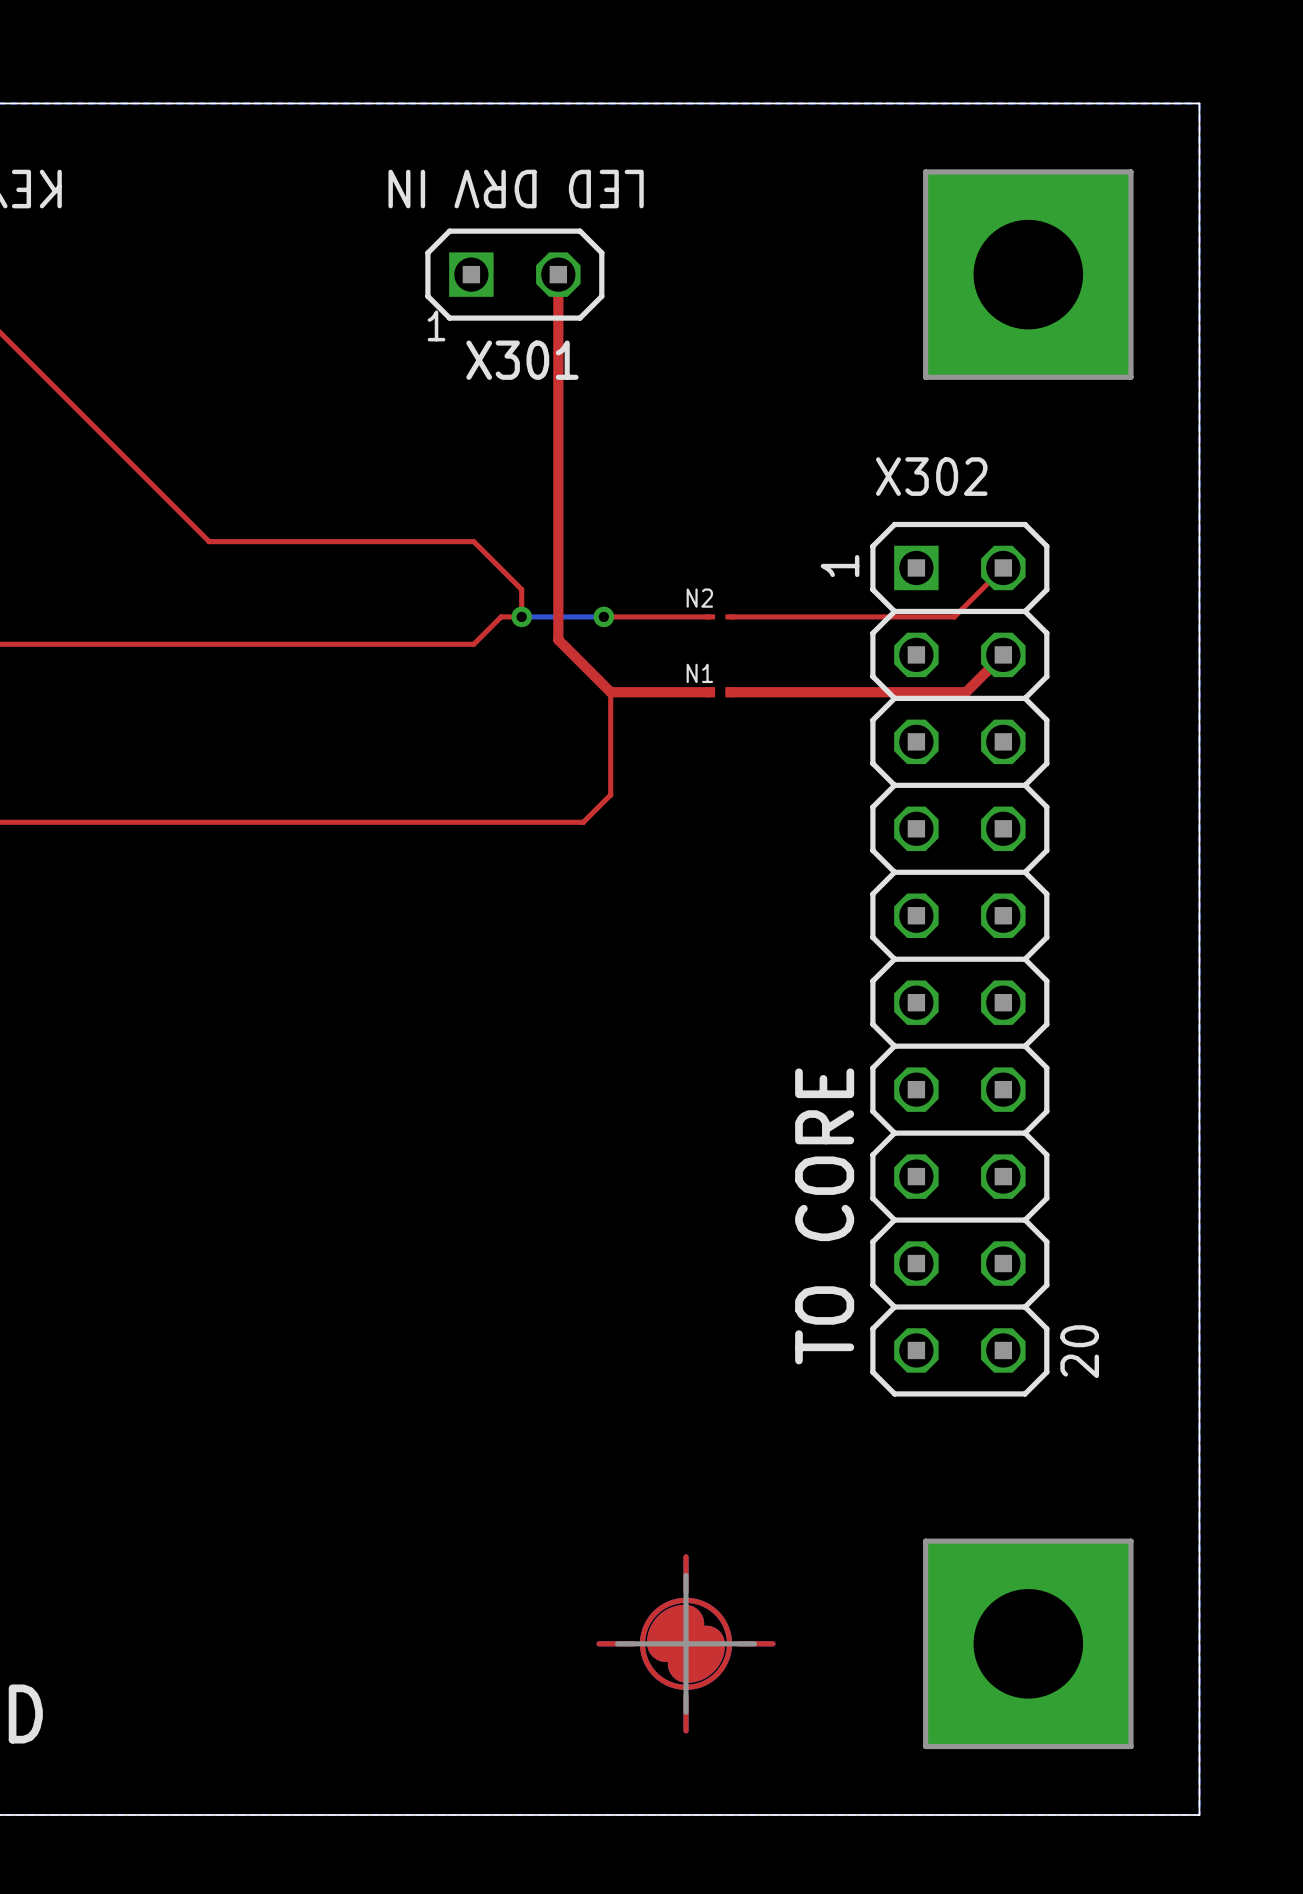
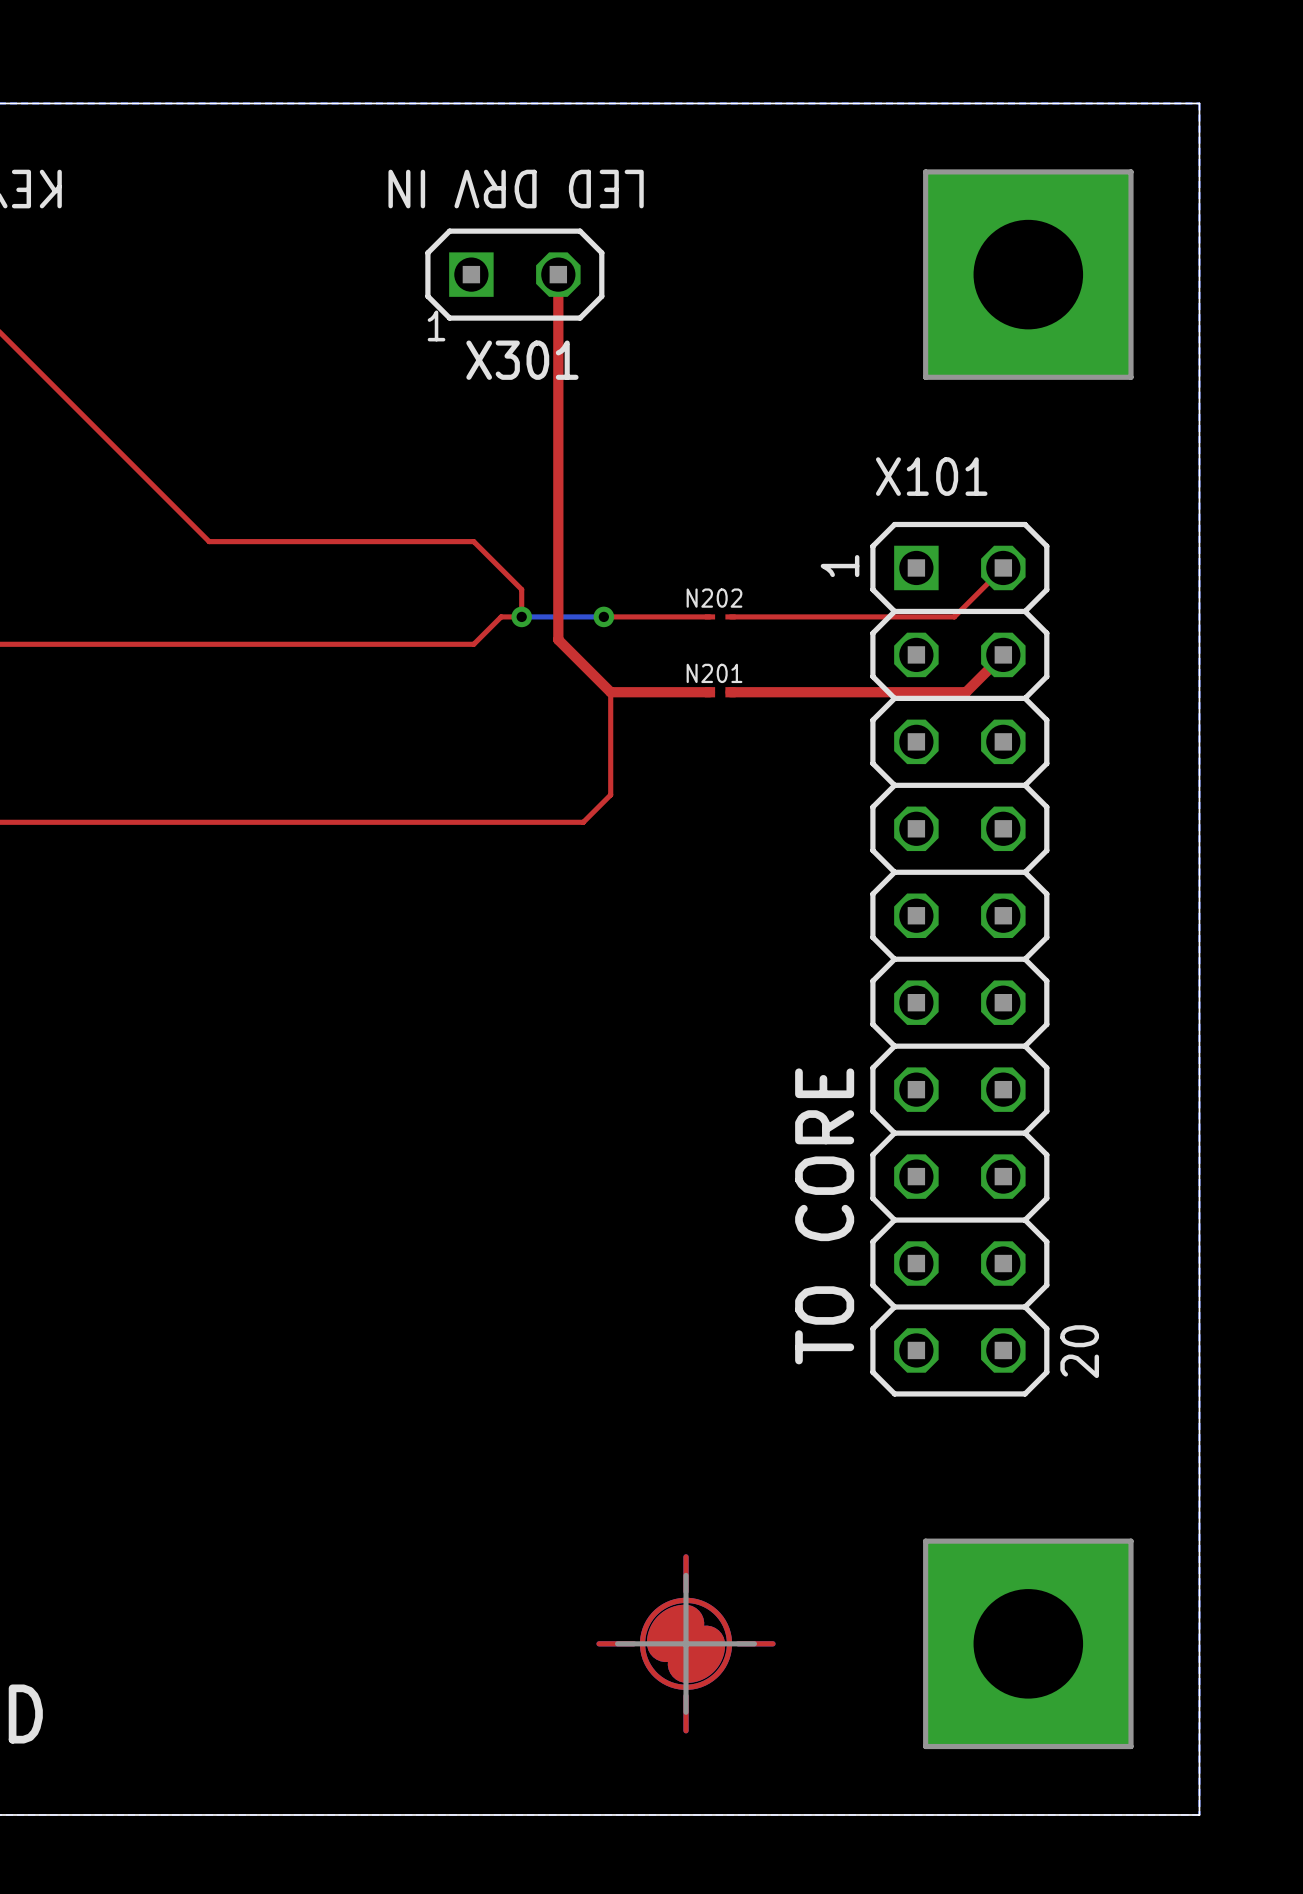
X302 name: X302 (931, 476) -> X101 (931, 476)
N2 name: N2 (699, 598) -> N202 (714, 598)
N1 name: N1 (699, 673) -> N201 (714, 673)

